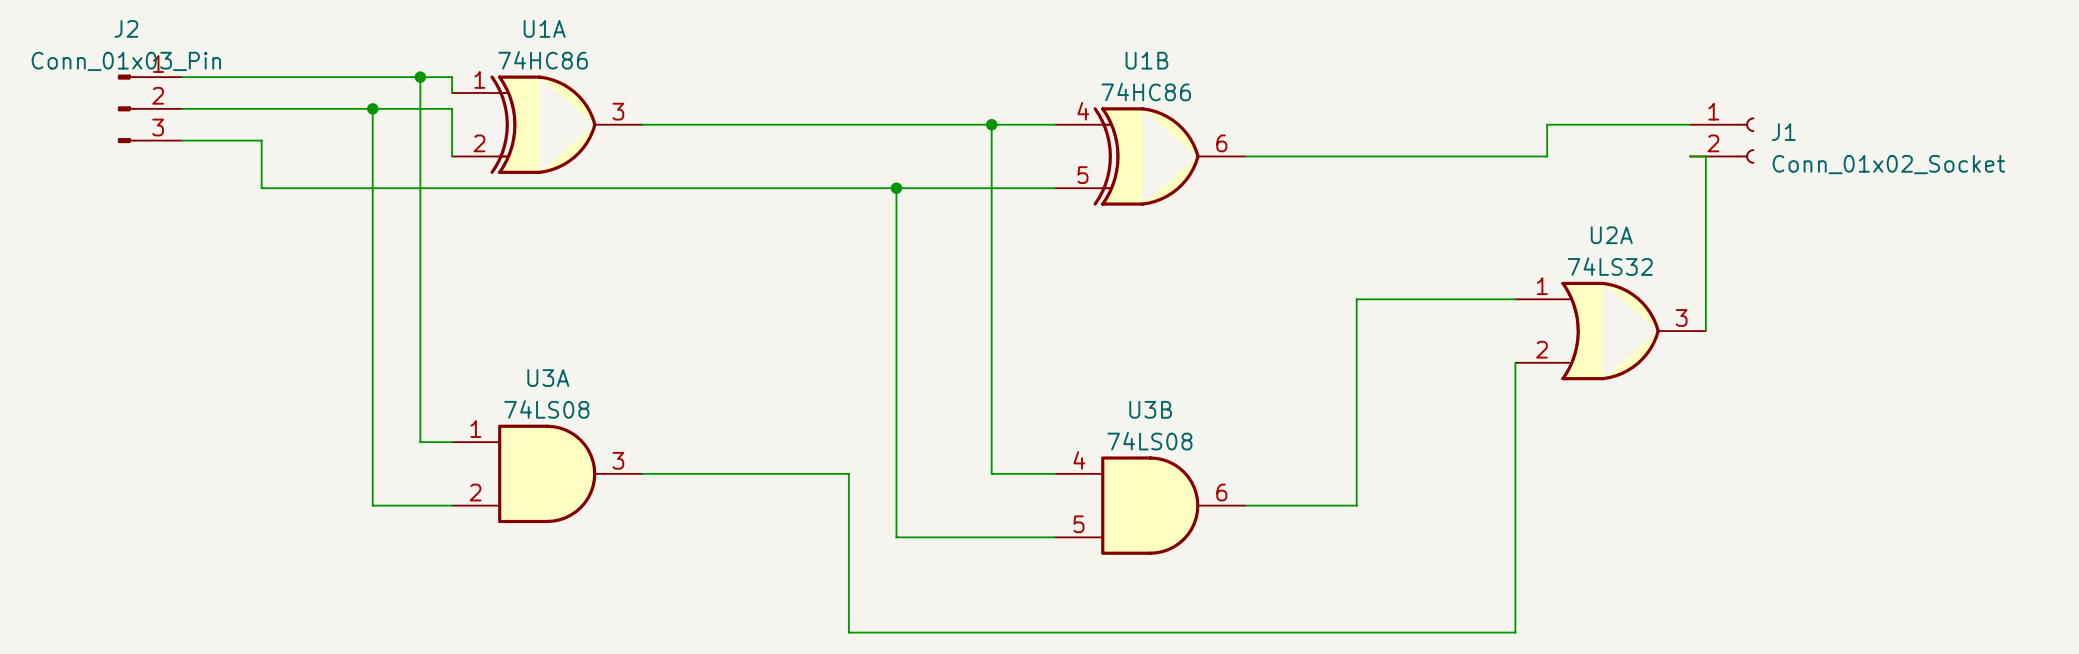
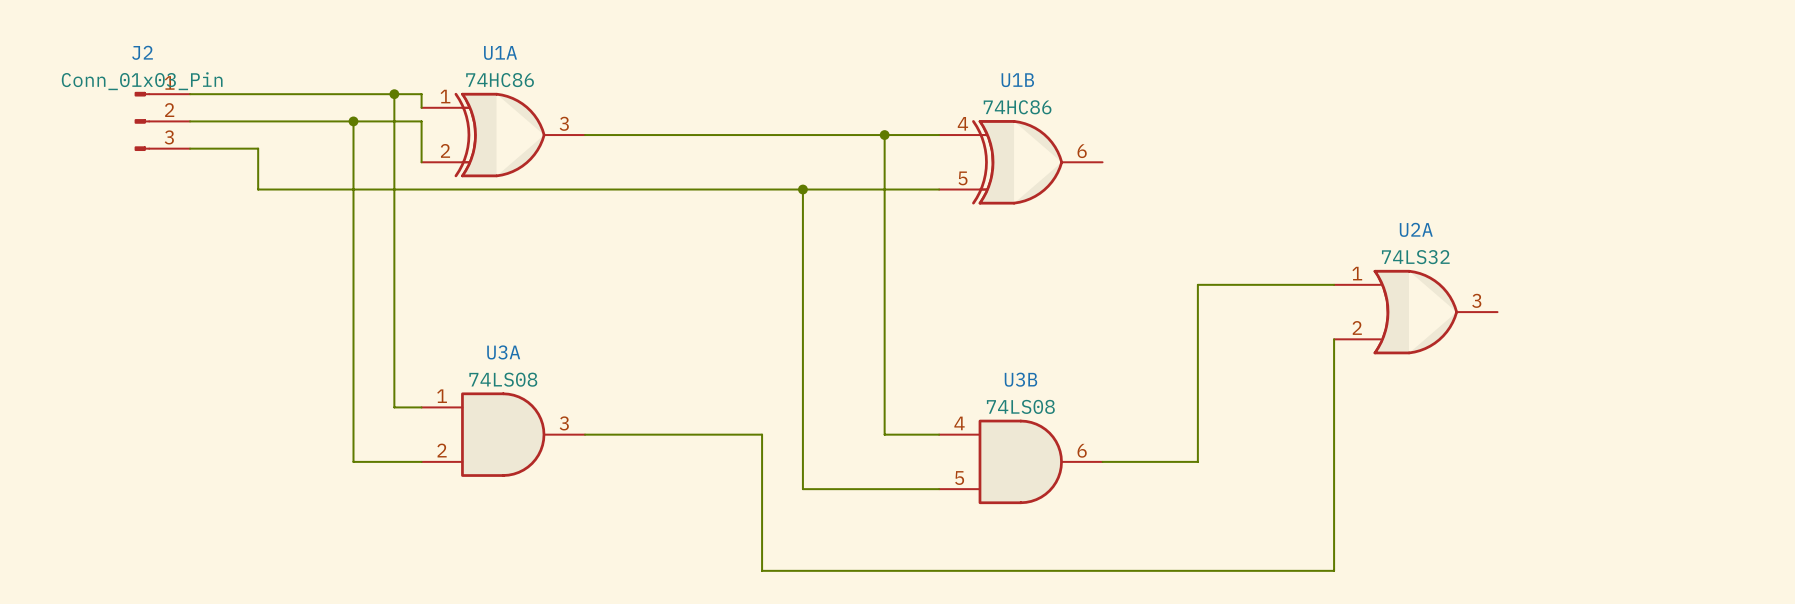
wire: (1689, 124) (1547, 124) (1547, 156) (1245, 156) -> none
J1: Conn_01x02_Socket (1722, 140) -> none
wire: (1689, 156) (1705, 156) (1705, 331) -> none

